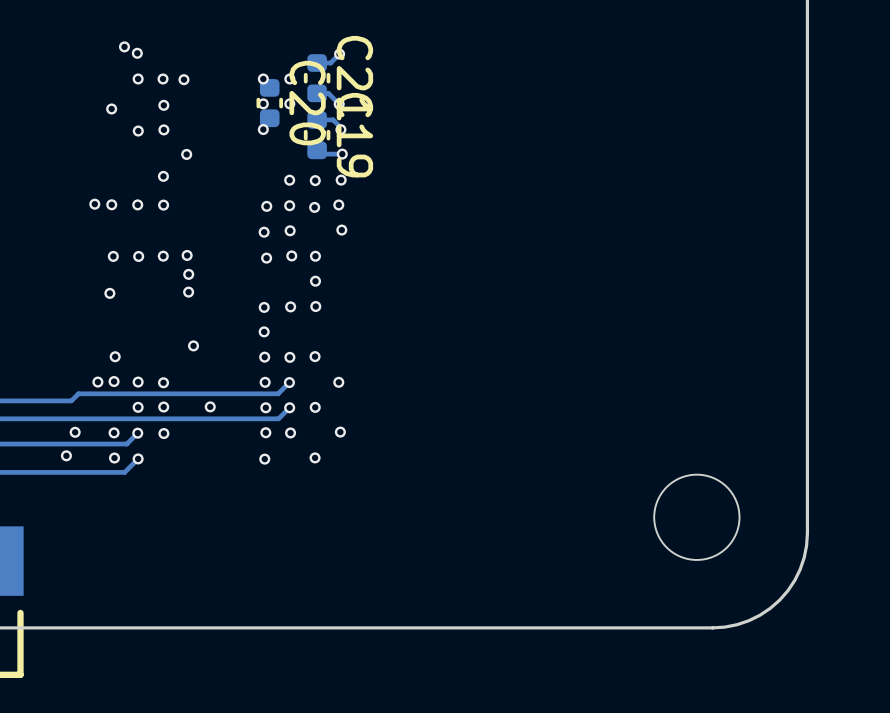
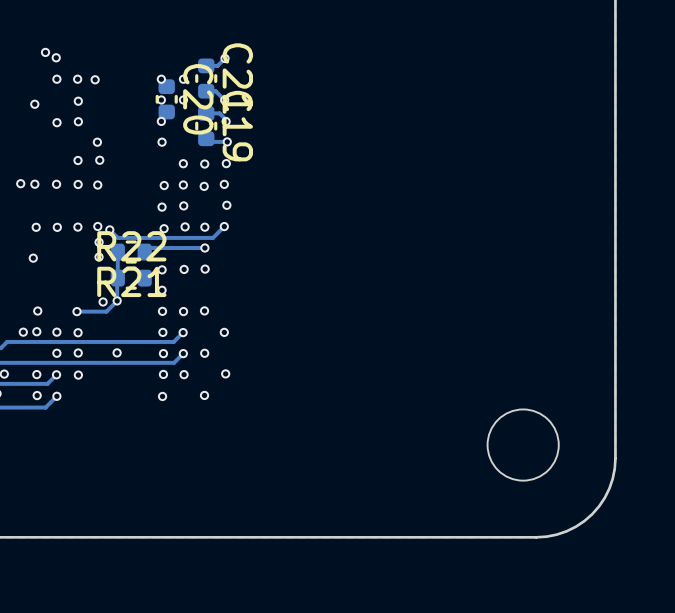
via: none -> (162, 142)
via: none -> (99, 160)
via: none -> (97, 185)
track: none -> (224, 226) (212, 237) (117, 237) (109, 229)
via: none -> (224, 226)
via: none -> (109, 229)
track: none -> (204, 248) (148, 248) (144, 252)
track: none -> (117, 252) (117, 300) (106, 311) (76, 311)
R21: none -> (131, 252)
R22: none -> (131, 278)
via: none -> (117, 300)
via: none -> (76, 311)

